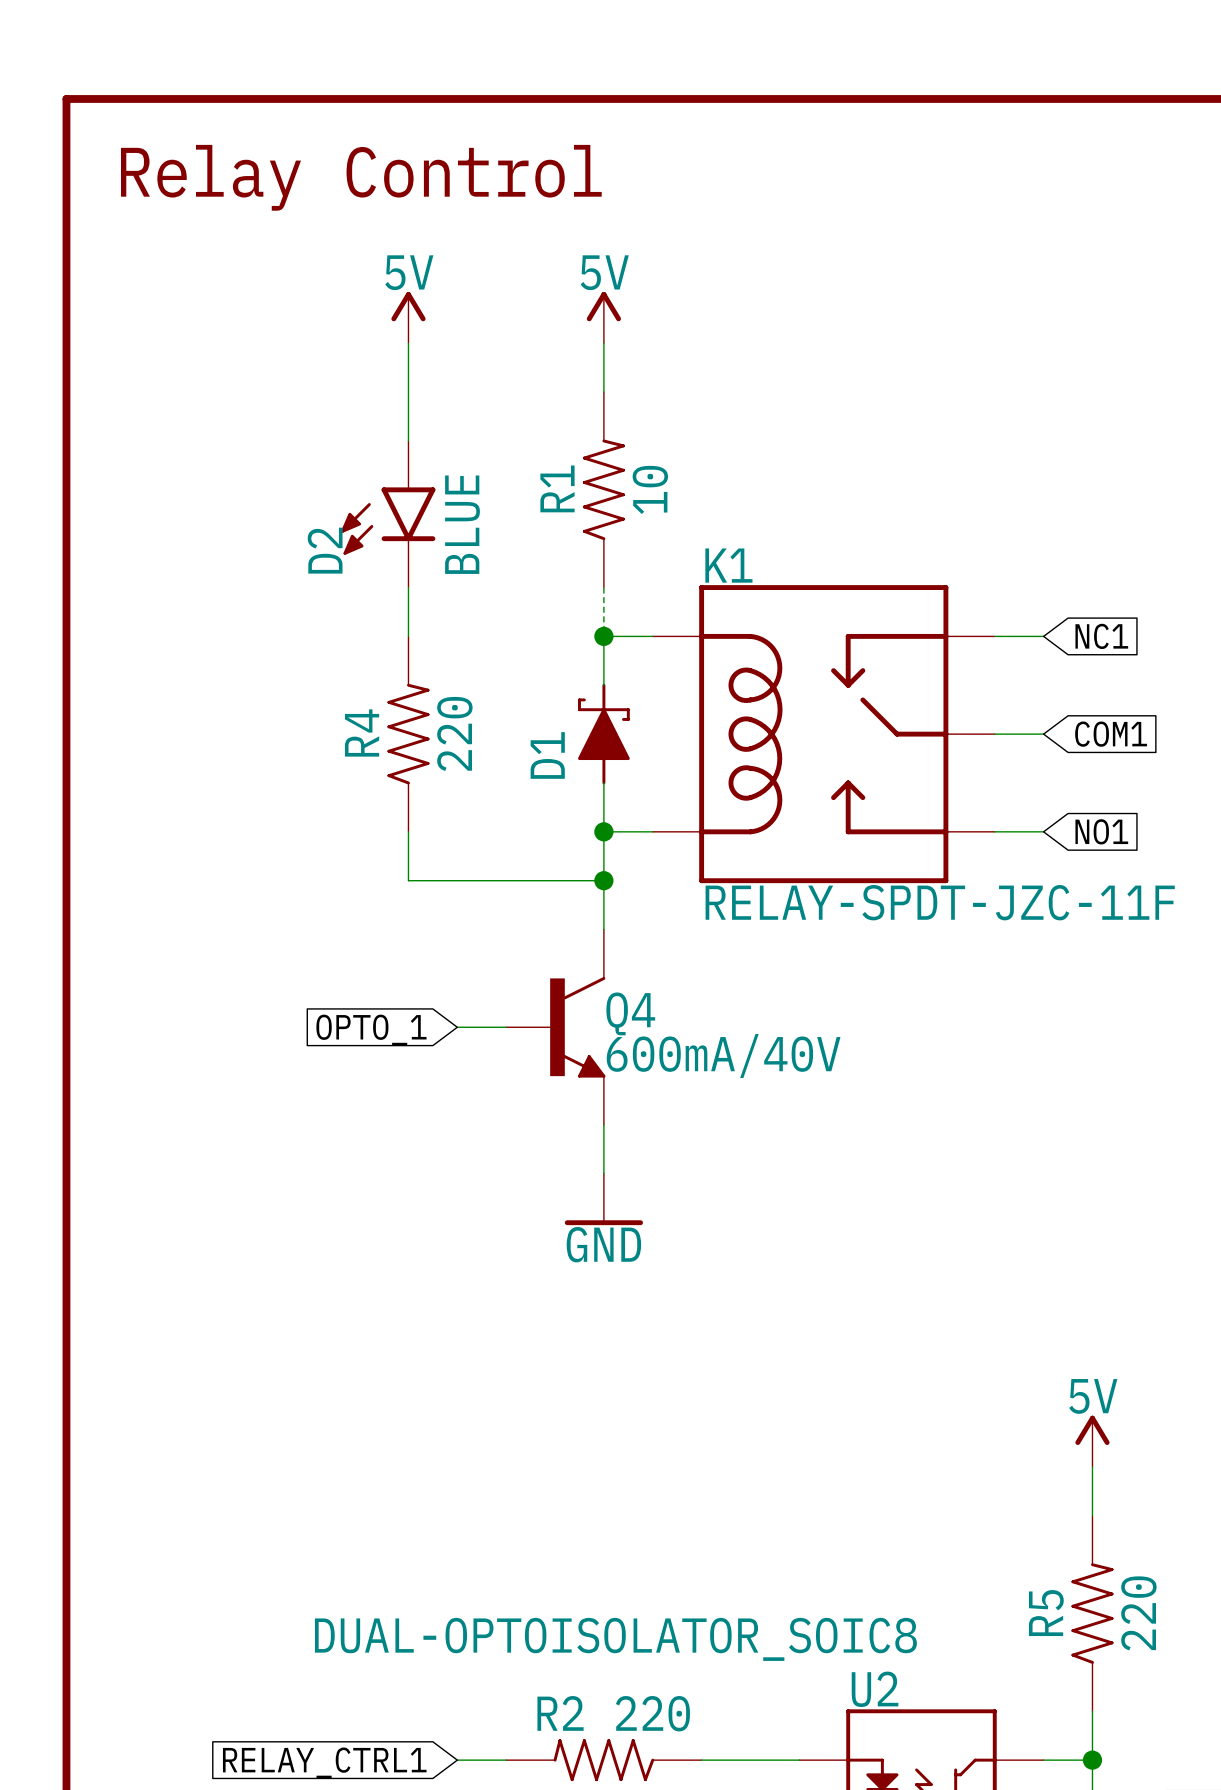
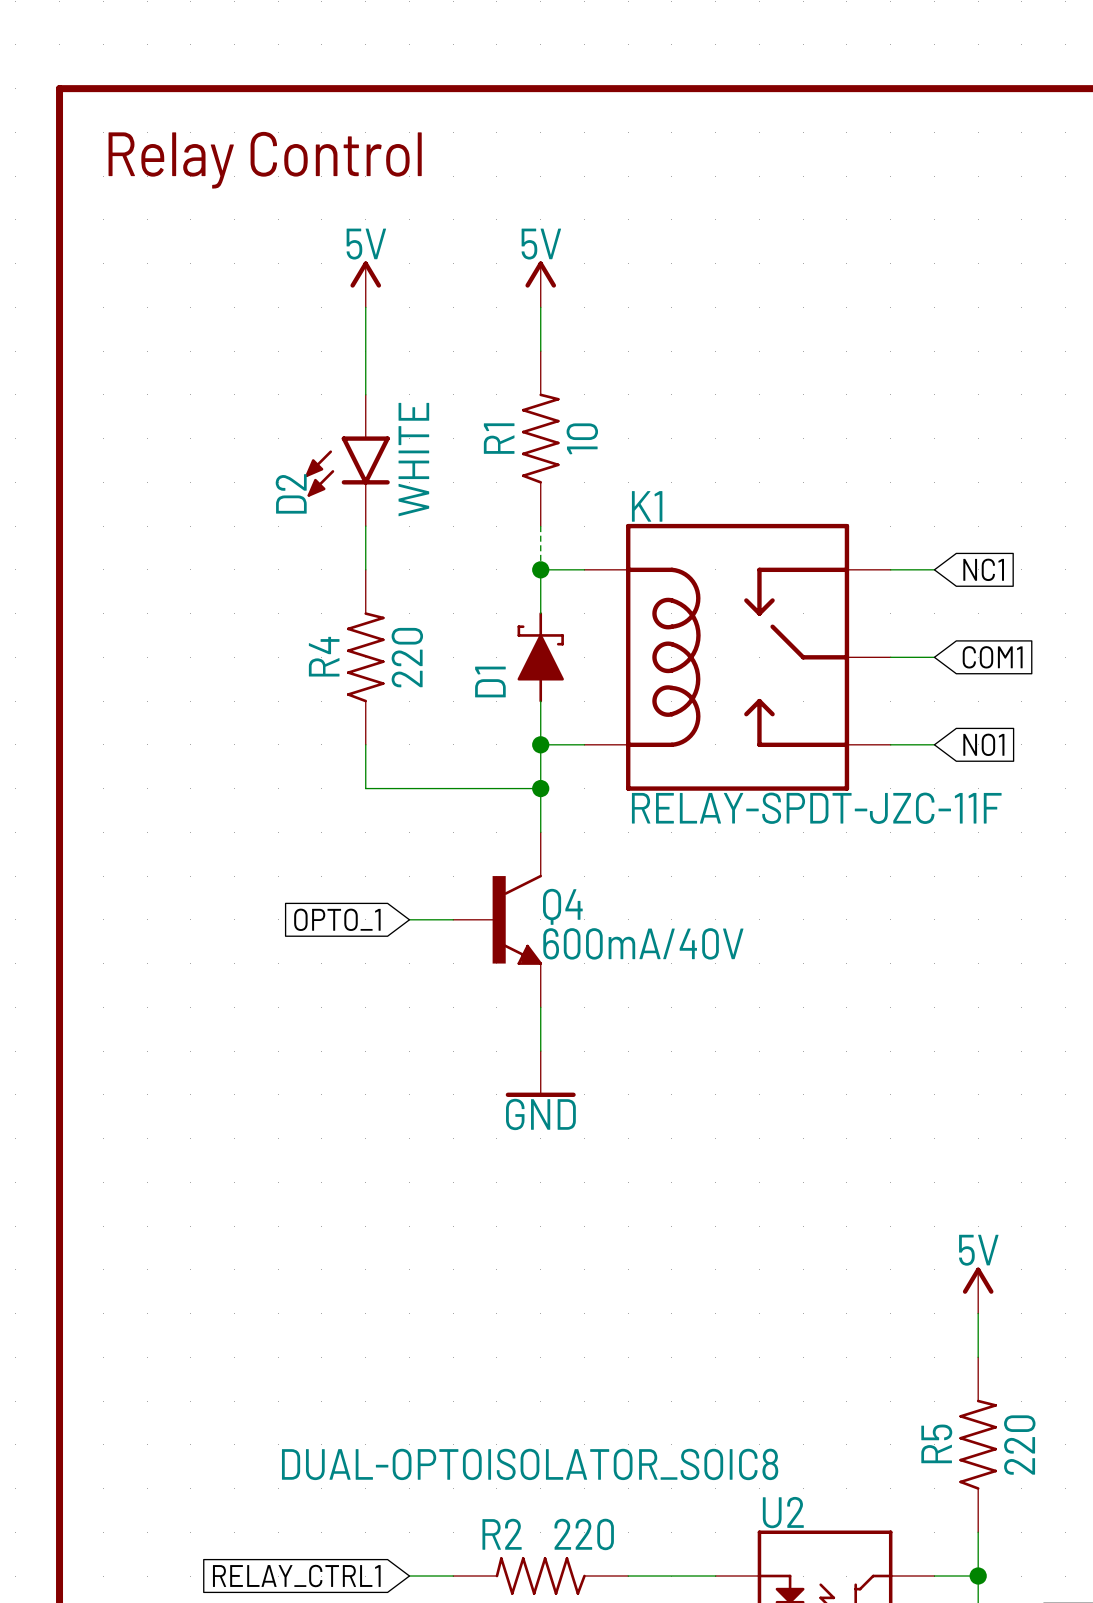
D2 value: BLUE (462, 524) -> WHITE (413, 459)

